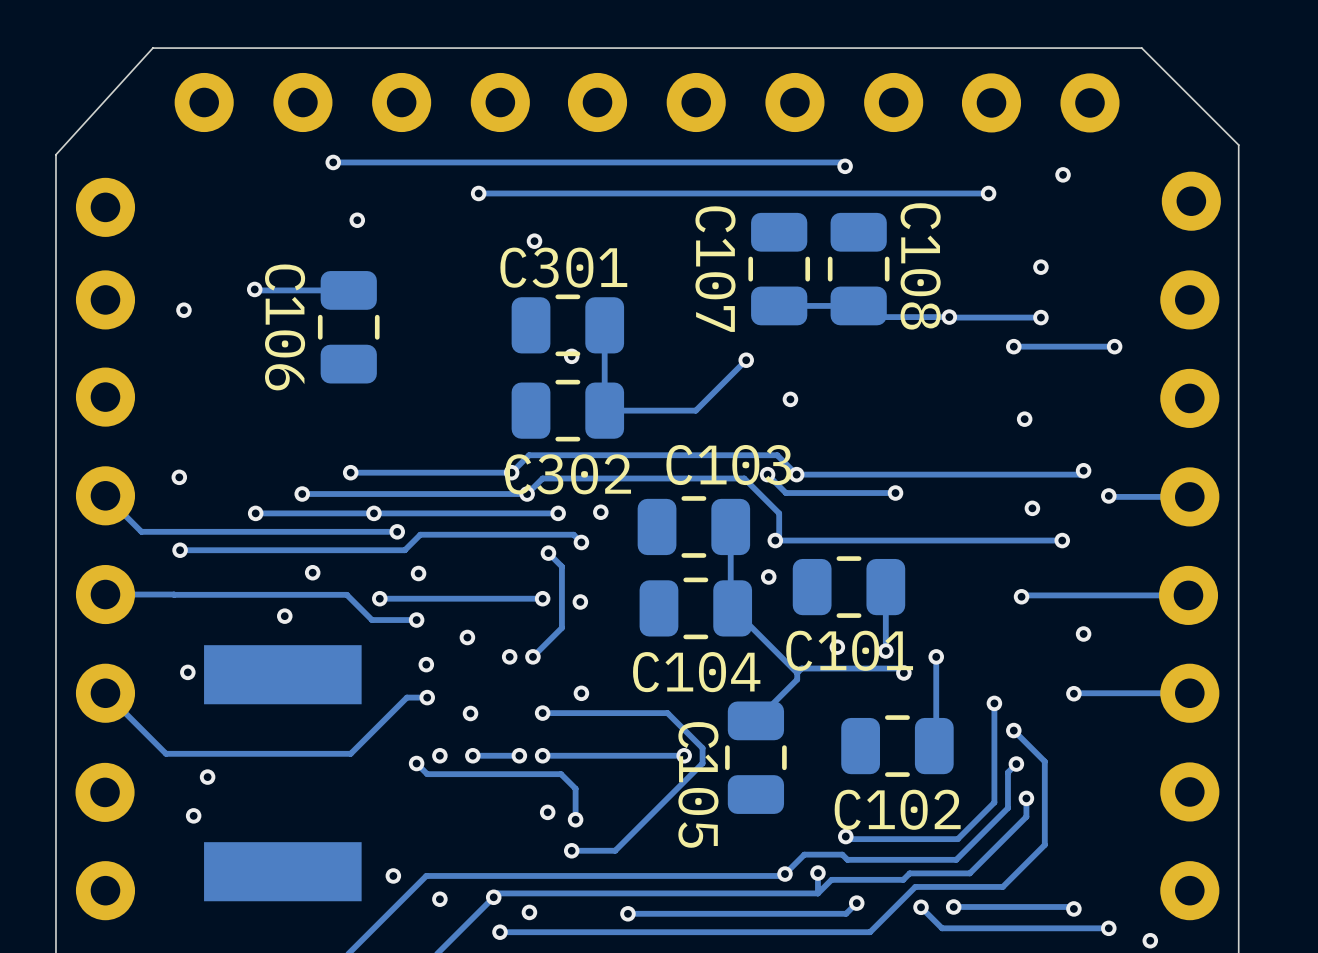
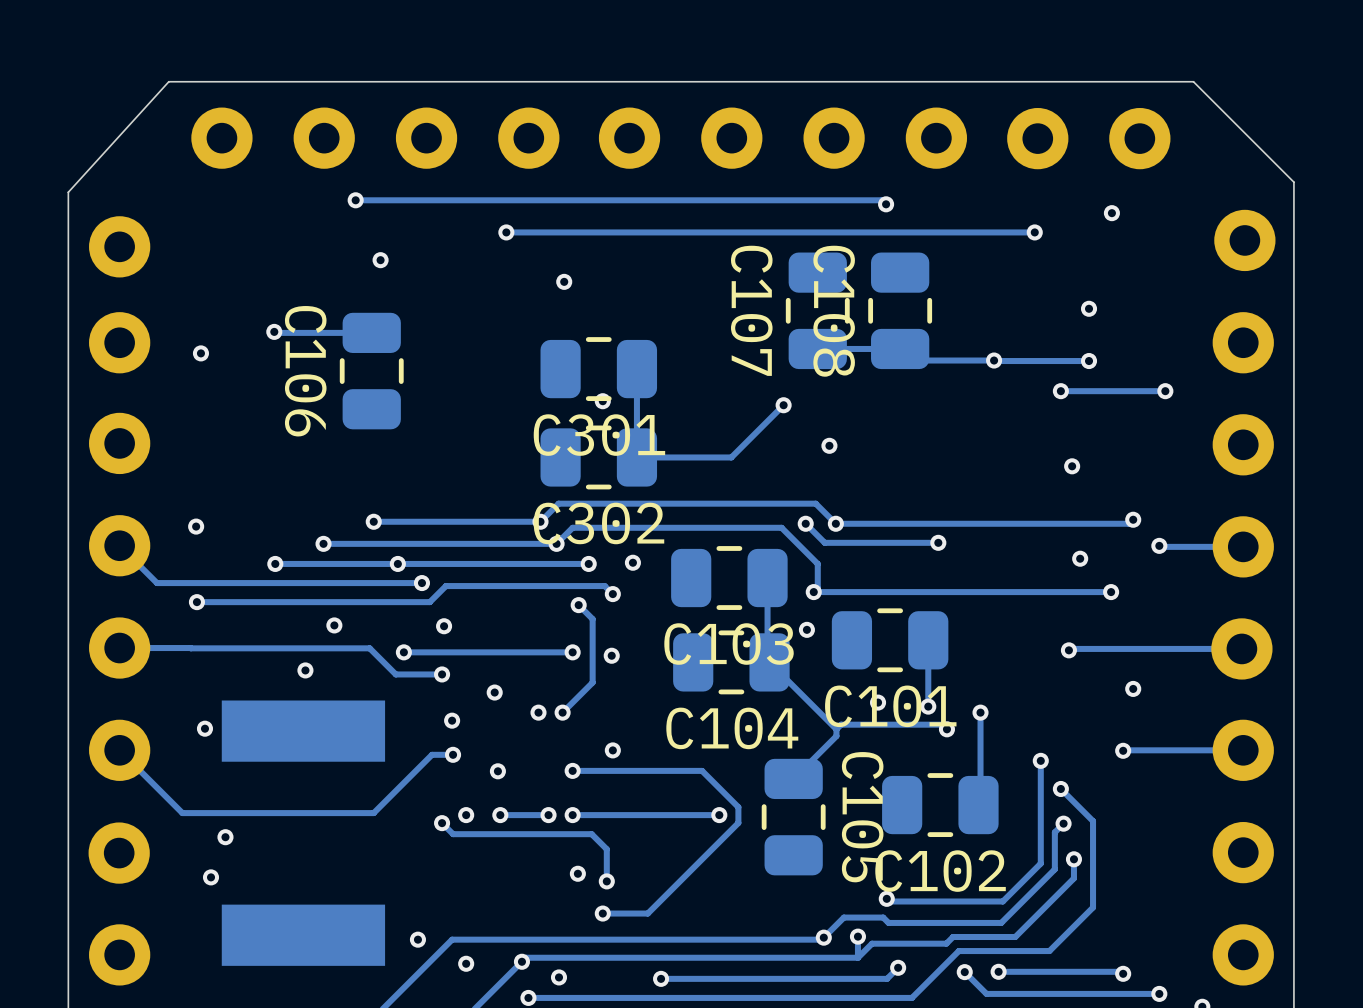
C108 name position: C108 (920, 266) -> C108 (834, 311)
C301 name position: C301 (563, 267) -> C301 (599, 435)
C103 name position: C103 (728, 465) -> C103 (729, 644)
C105 name position: C105 (698, 784) -> C105 (862, 817)

